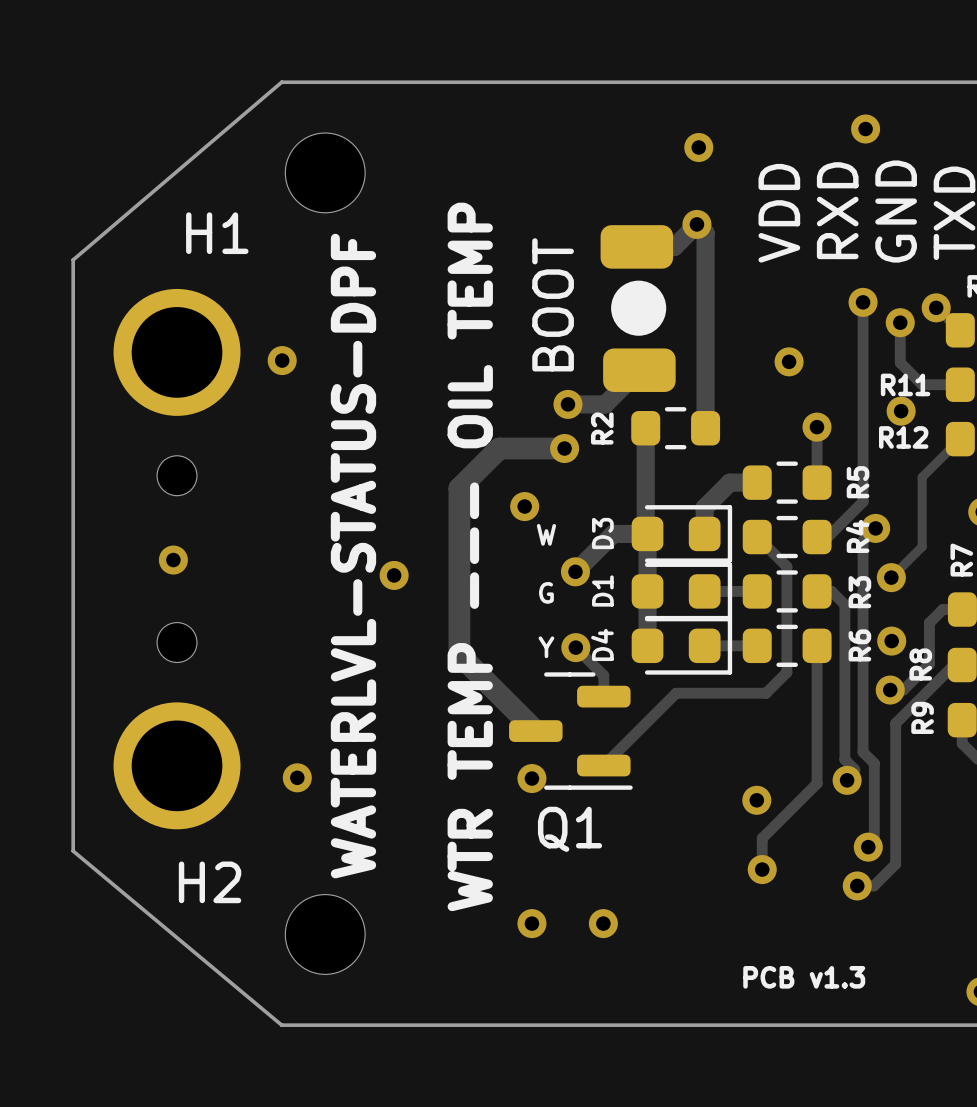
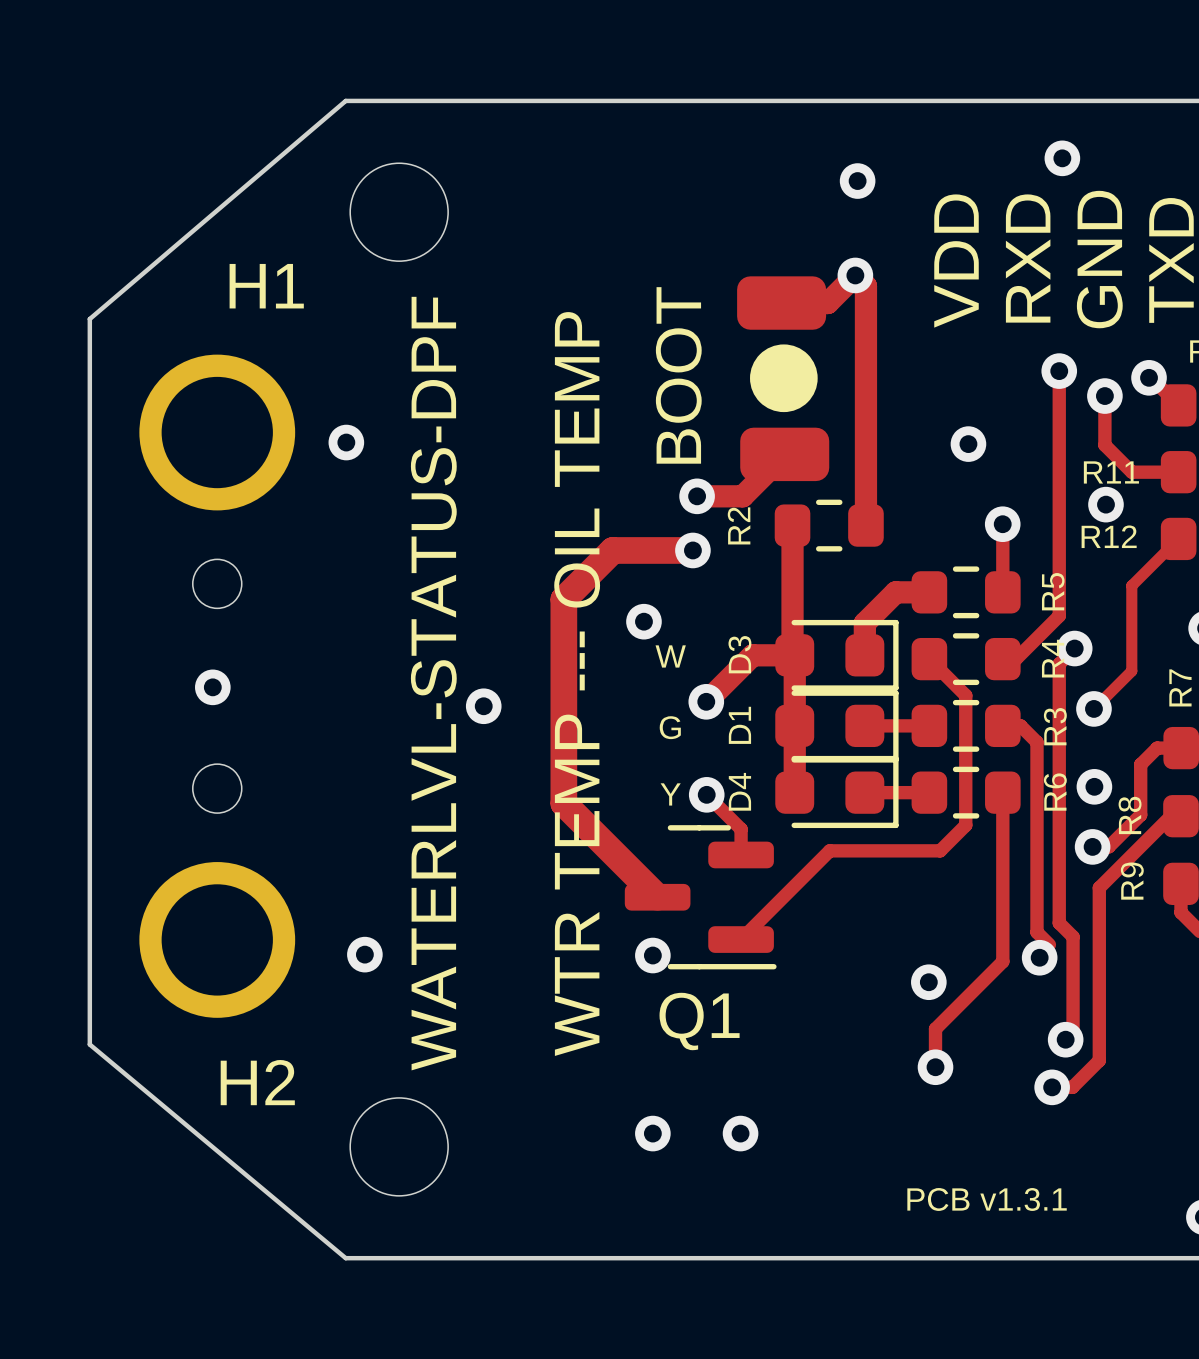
text: PCB v1.3 (804, 977) -> PCB v1.3.1 (987, 1199)

